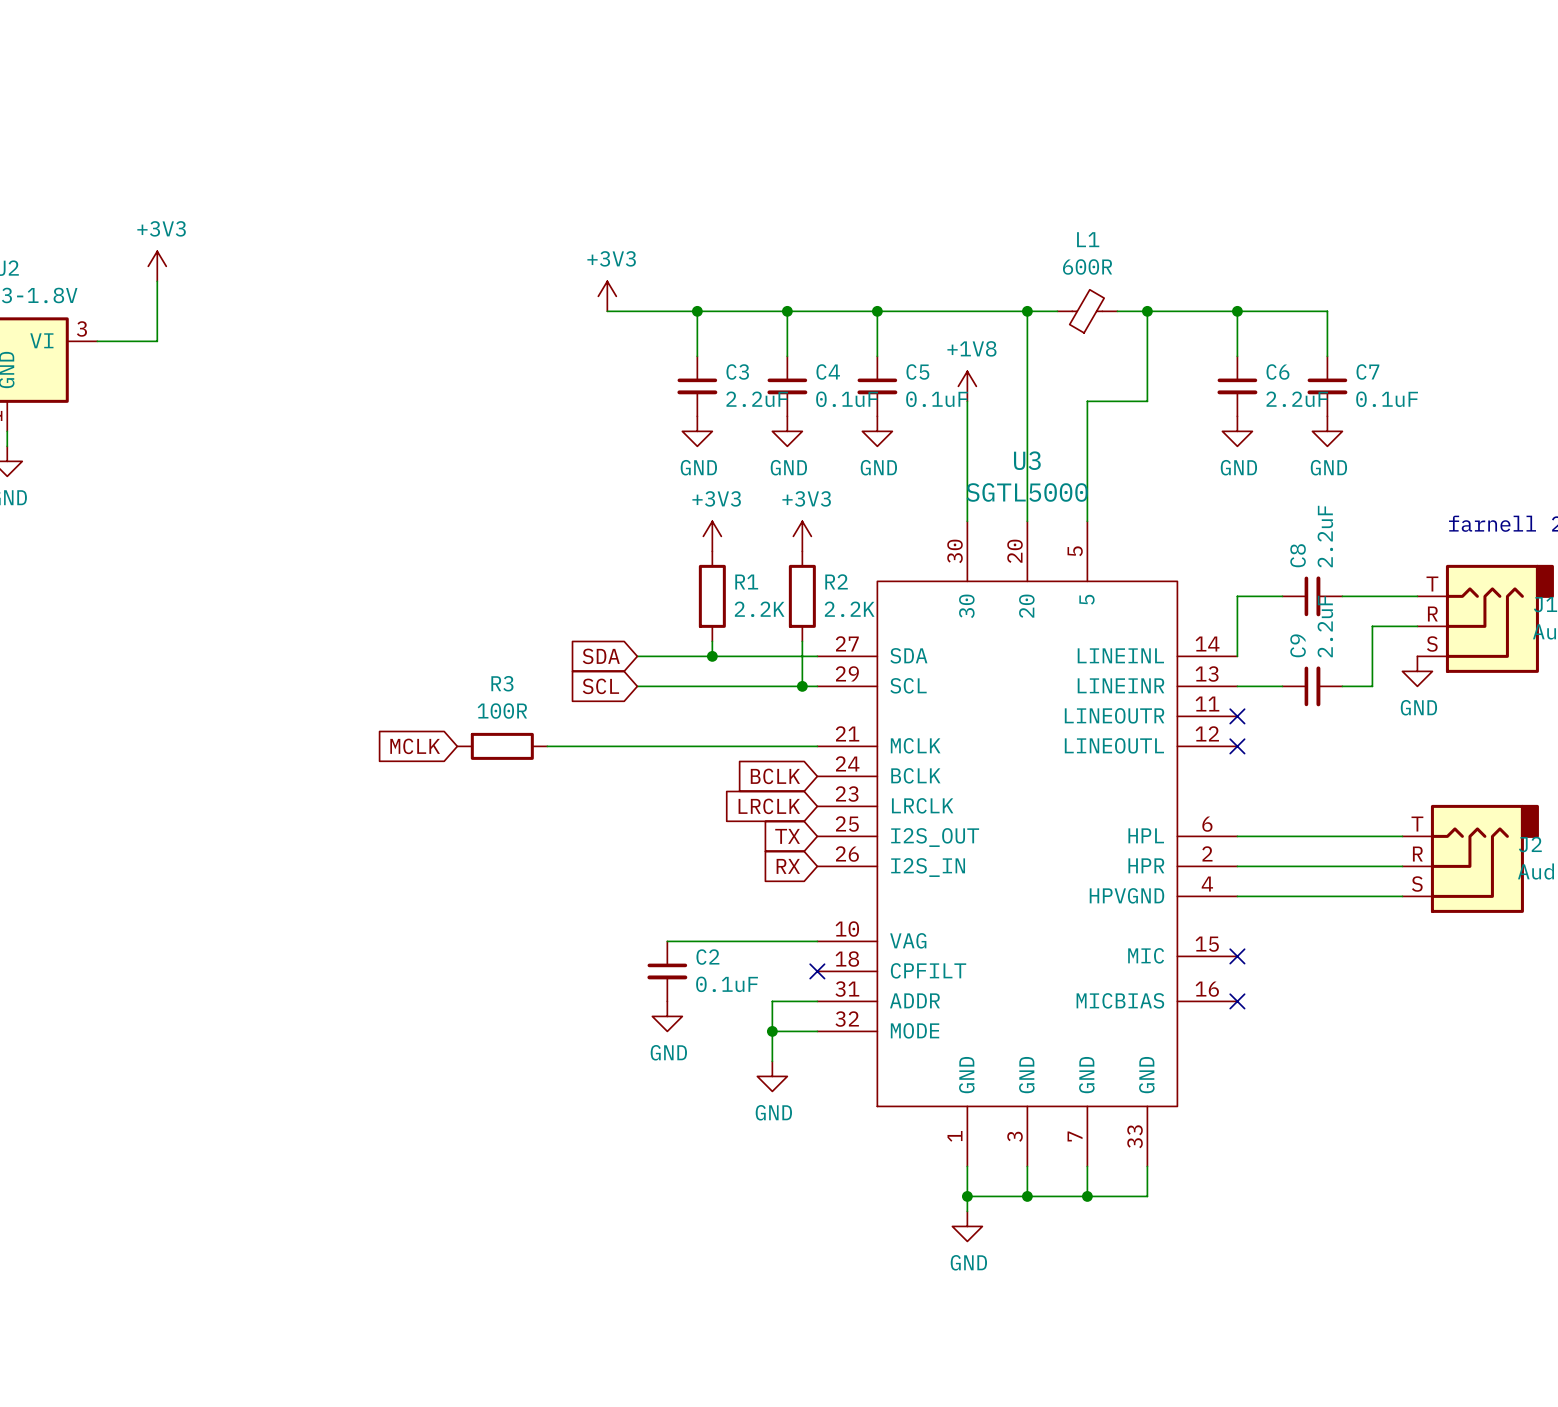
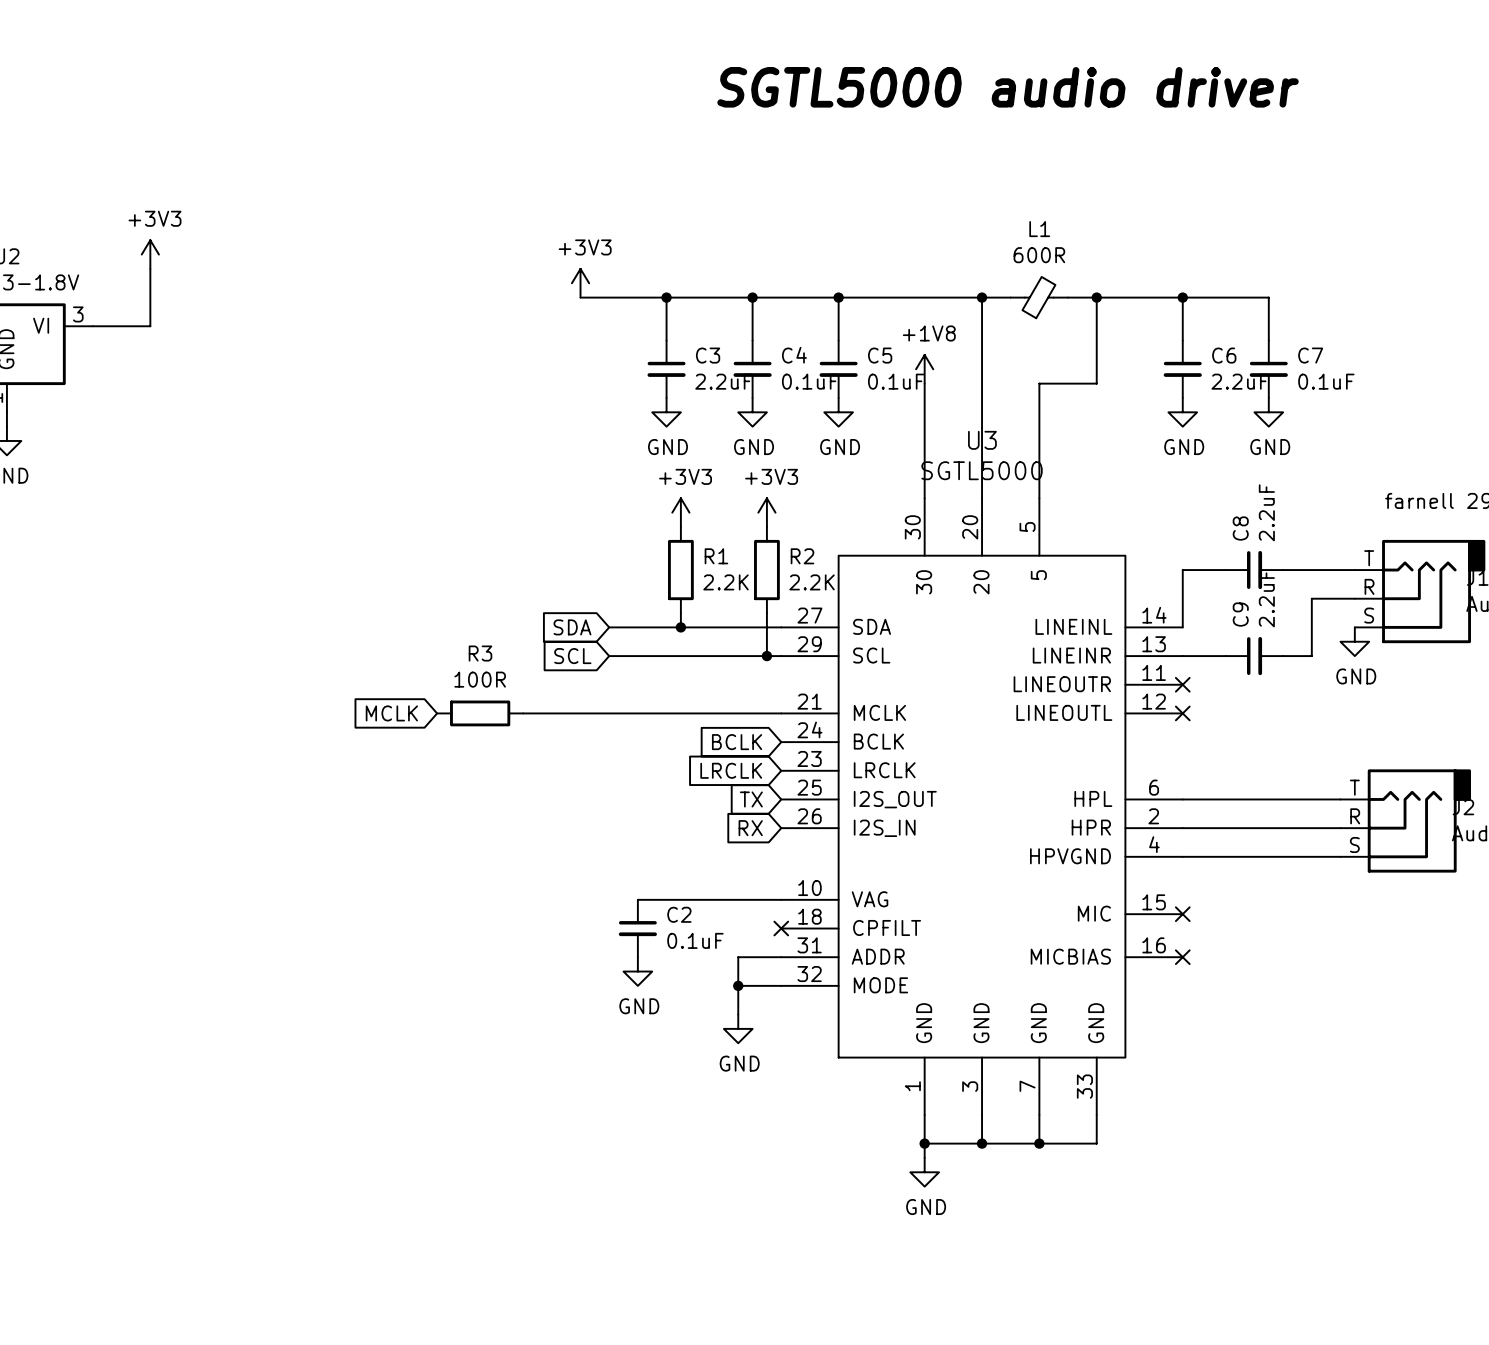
text: none -> SGTL5000 audio driver (1008, 87)

